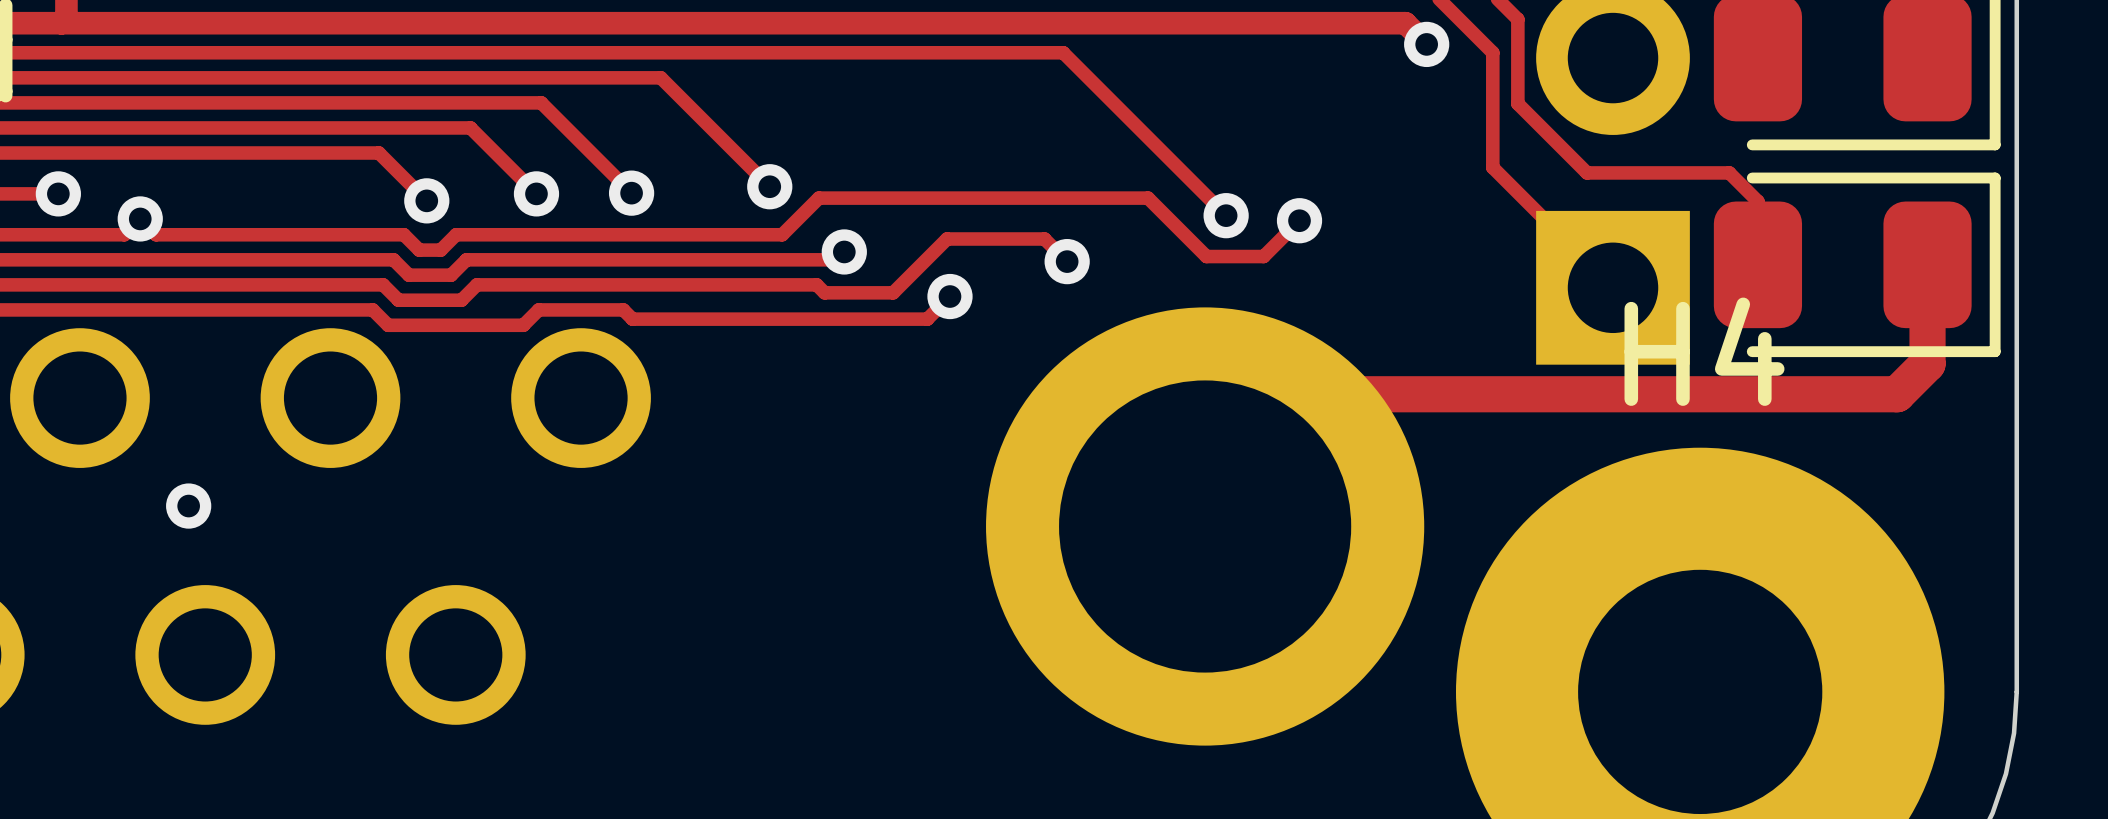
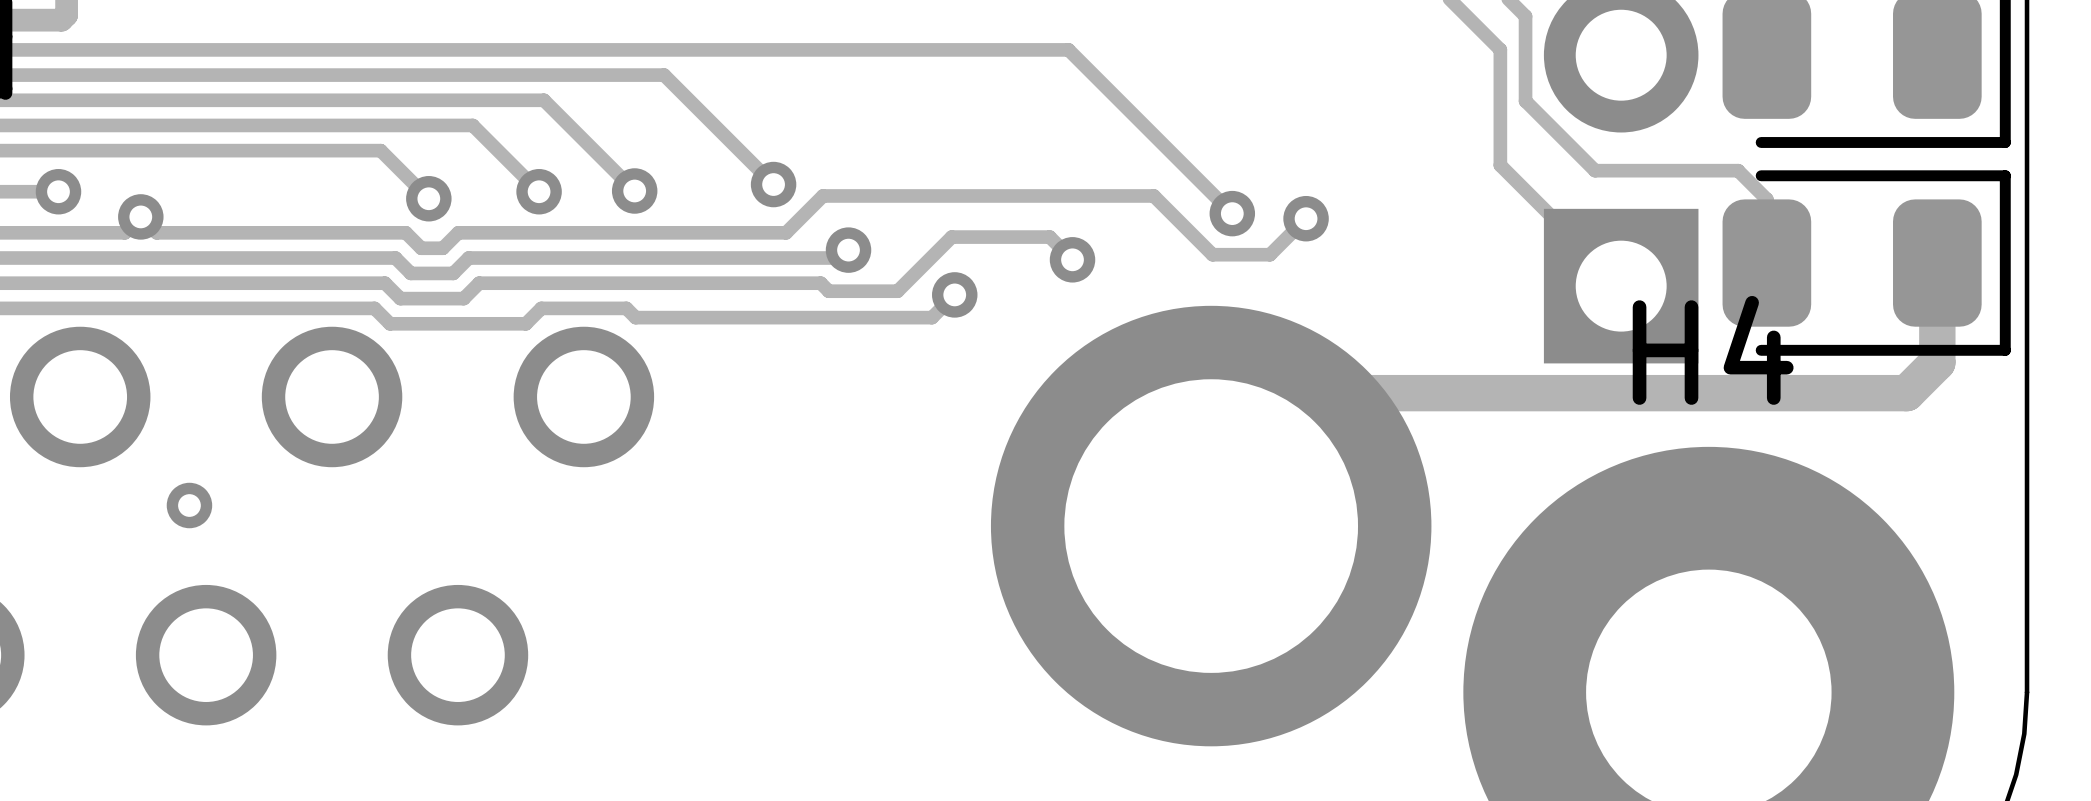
track: (61, 23) (1405, 23) (1426, 44) -> none
via: (1426, 44) -> none

